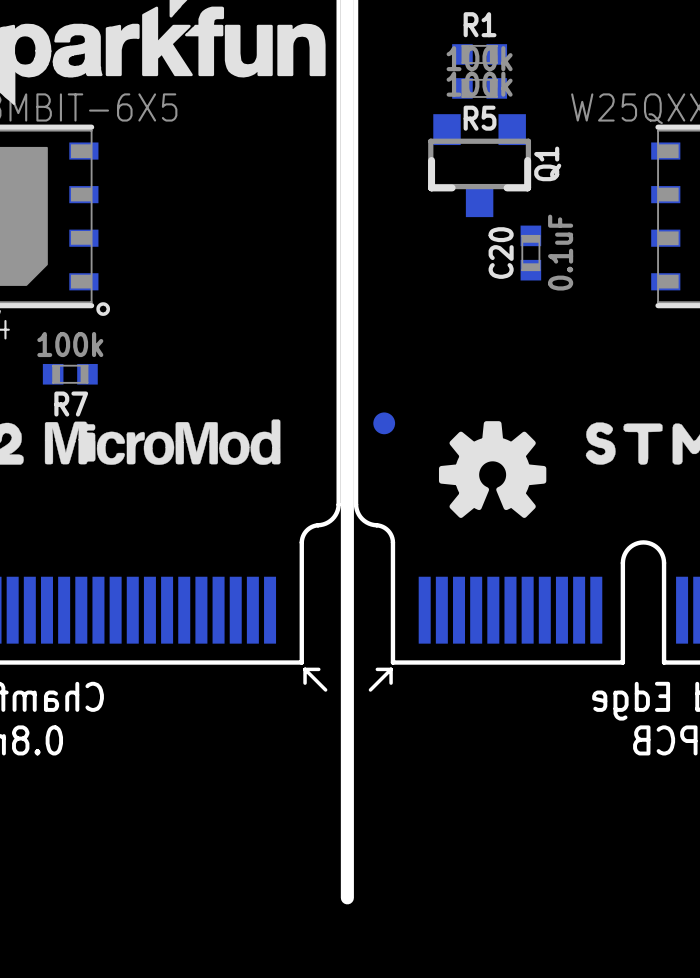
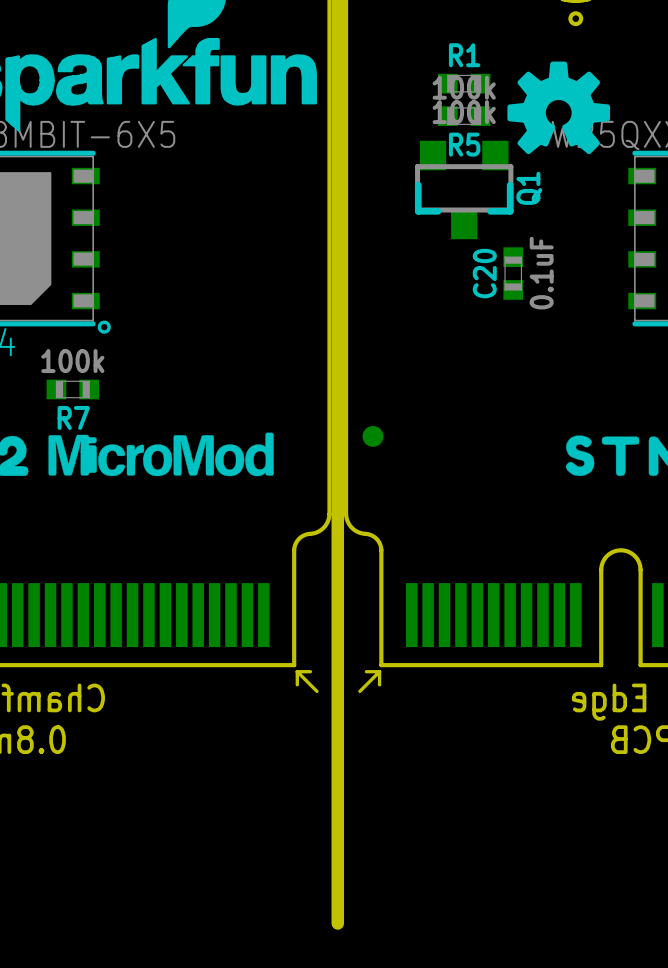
drawing position: (492, 469) -> (558, 107)
board edge: none -> (337, 890) (337, 923)

